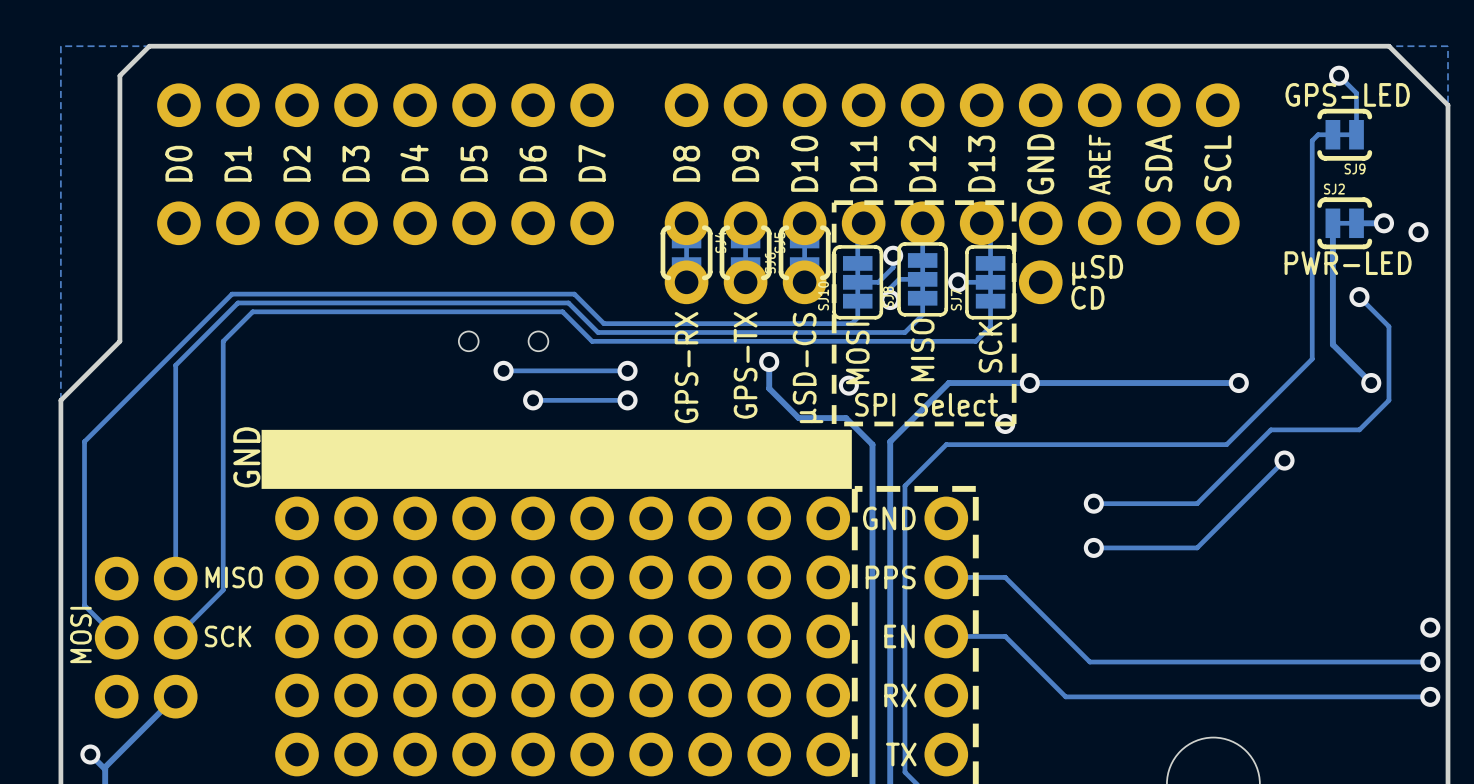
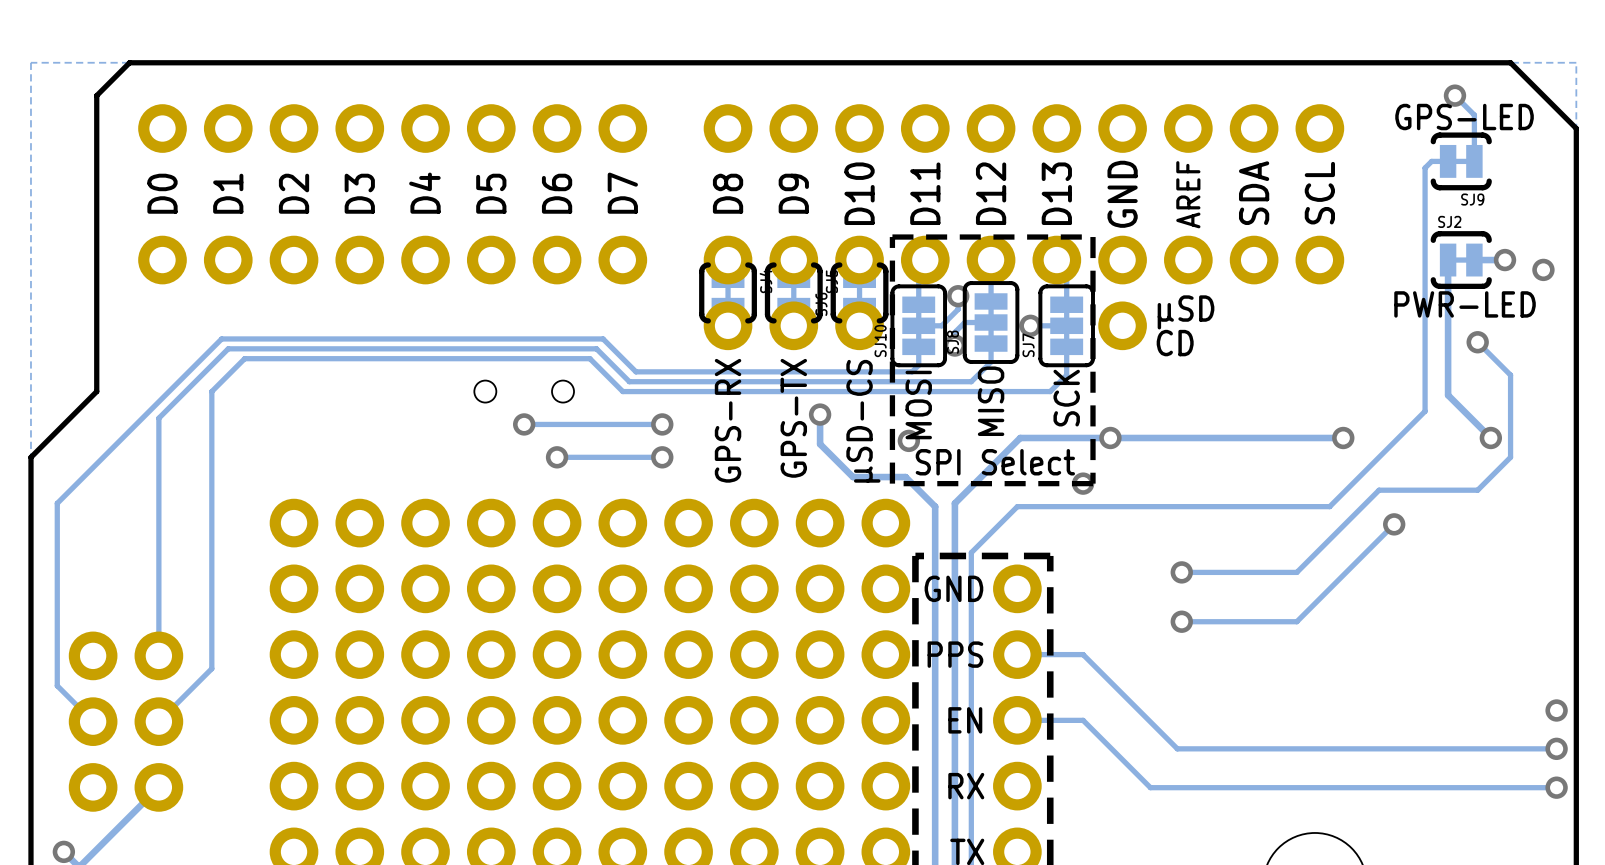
drawing: [261, 429, 852, 489] -> none
text: GND (246, 457) -> none
text: MISO (234, 577) -> none
text: MOSI (80, 634) -> none
text: SCK (228, 636) -> none

